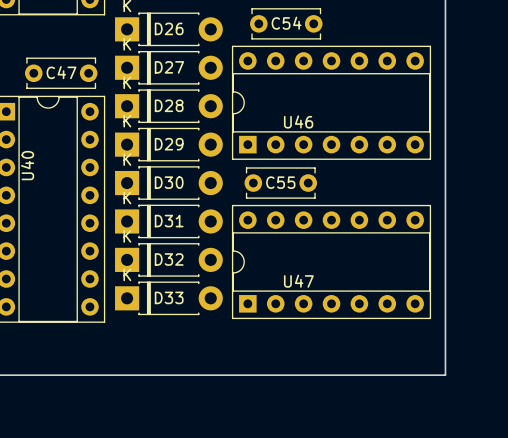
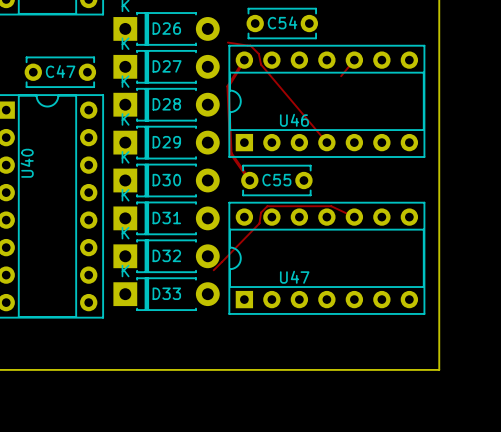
track: none -> (227, 42) (250, 45) (258, 53) (261, 64) (326, 142)
track: none -> (244, 60) (228, 86) (230, 153) (249, 180)
track: none -> (354, 60) (341, 76)
track: none -> (354, 217) (331, 206) (267, 206) (261, 212) (259, 223) (213, 270)

